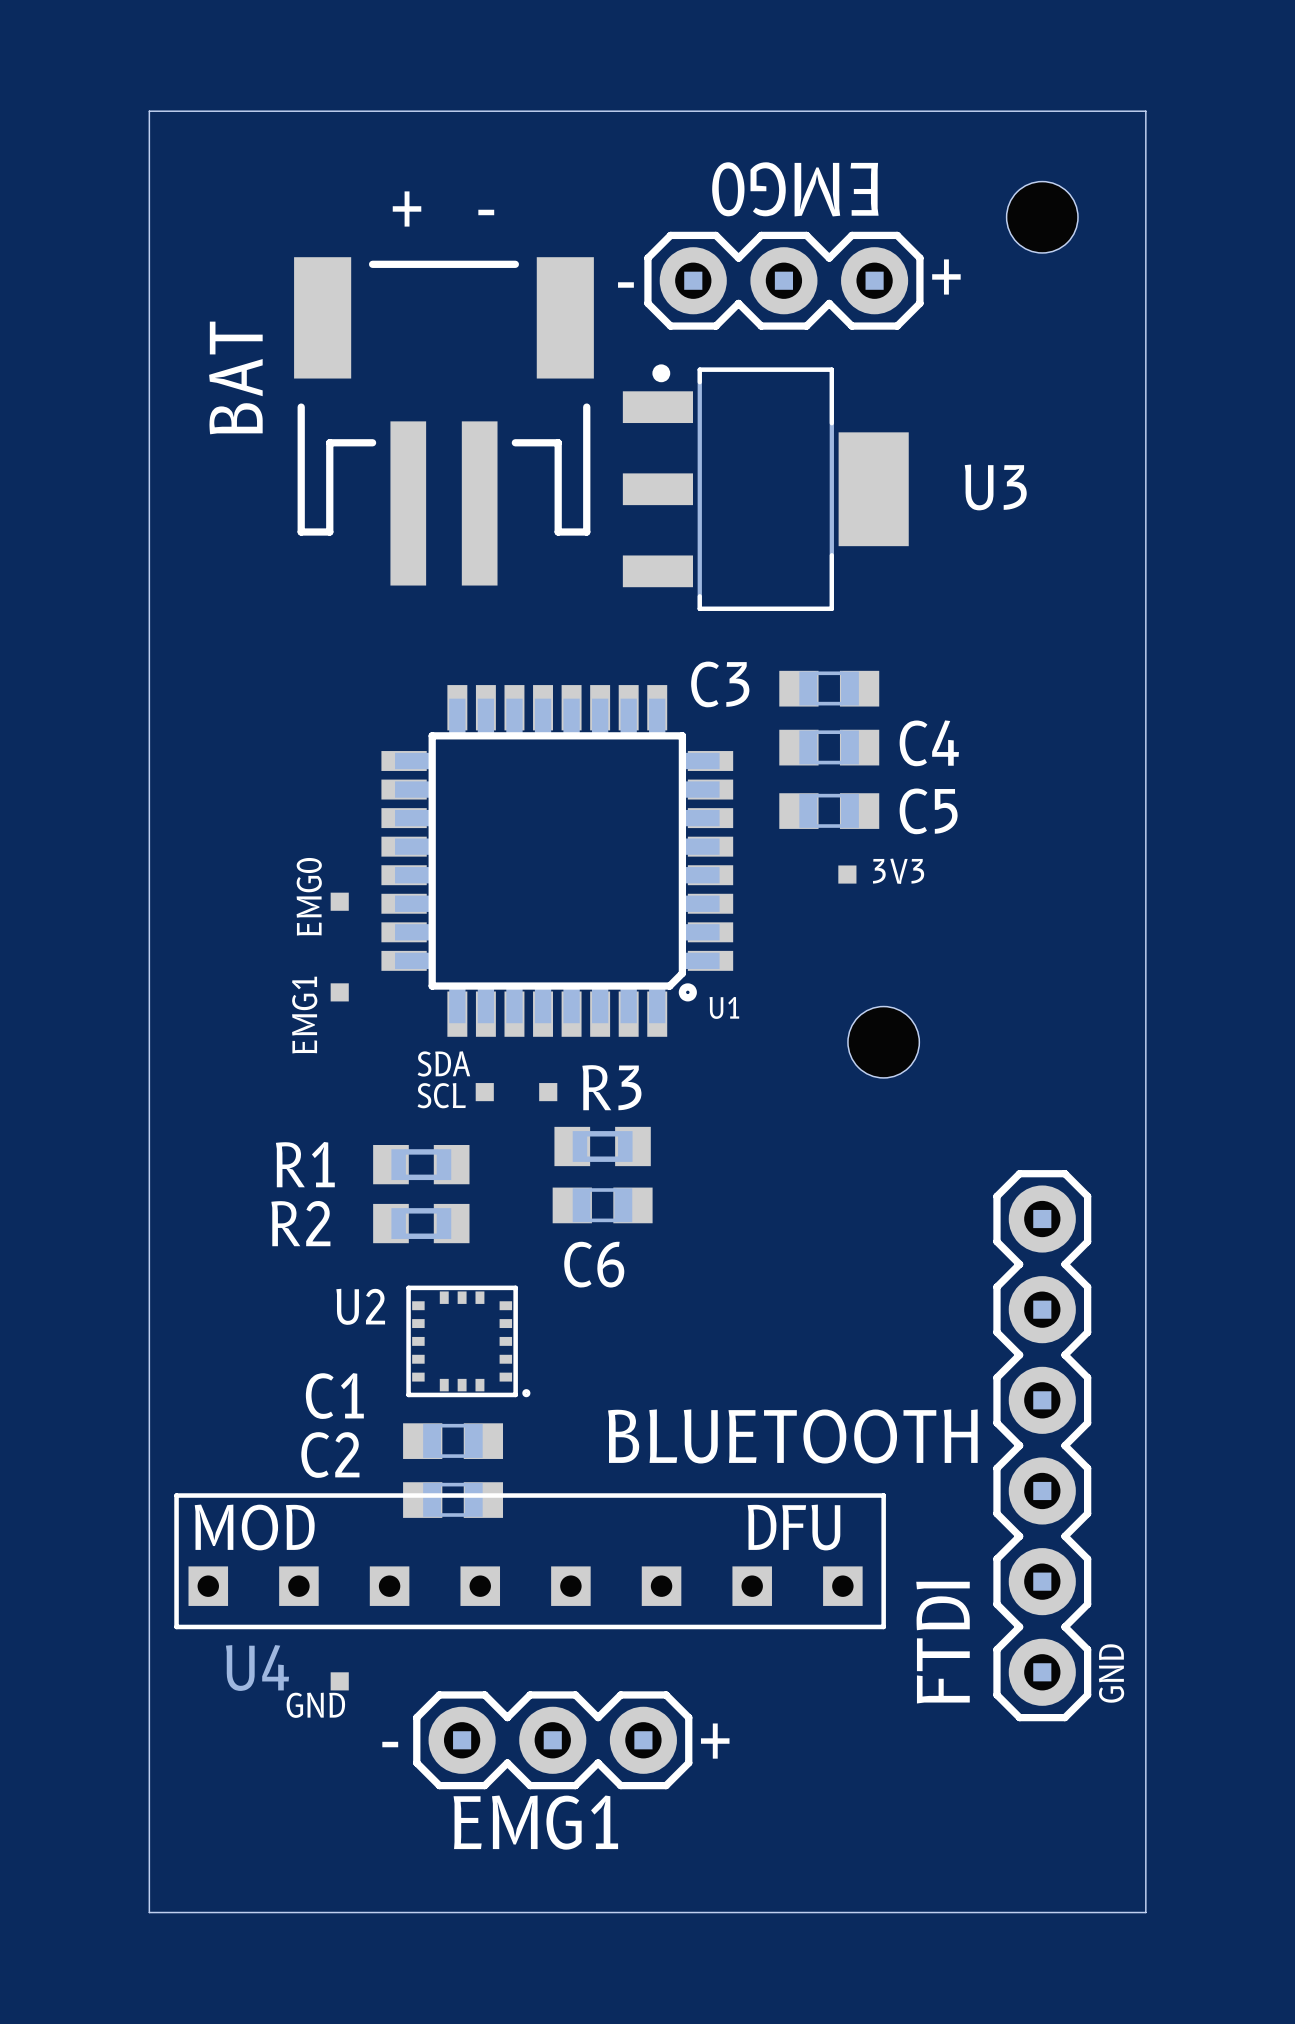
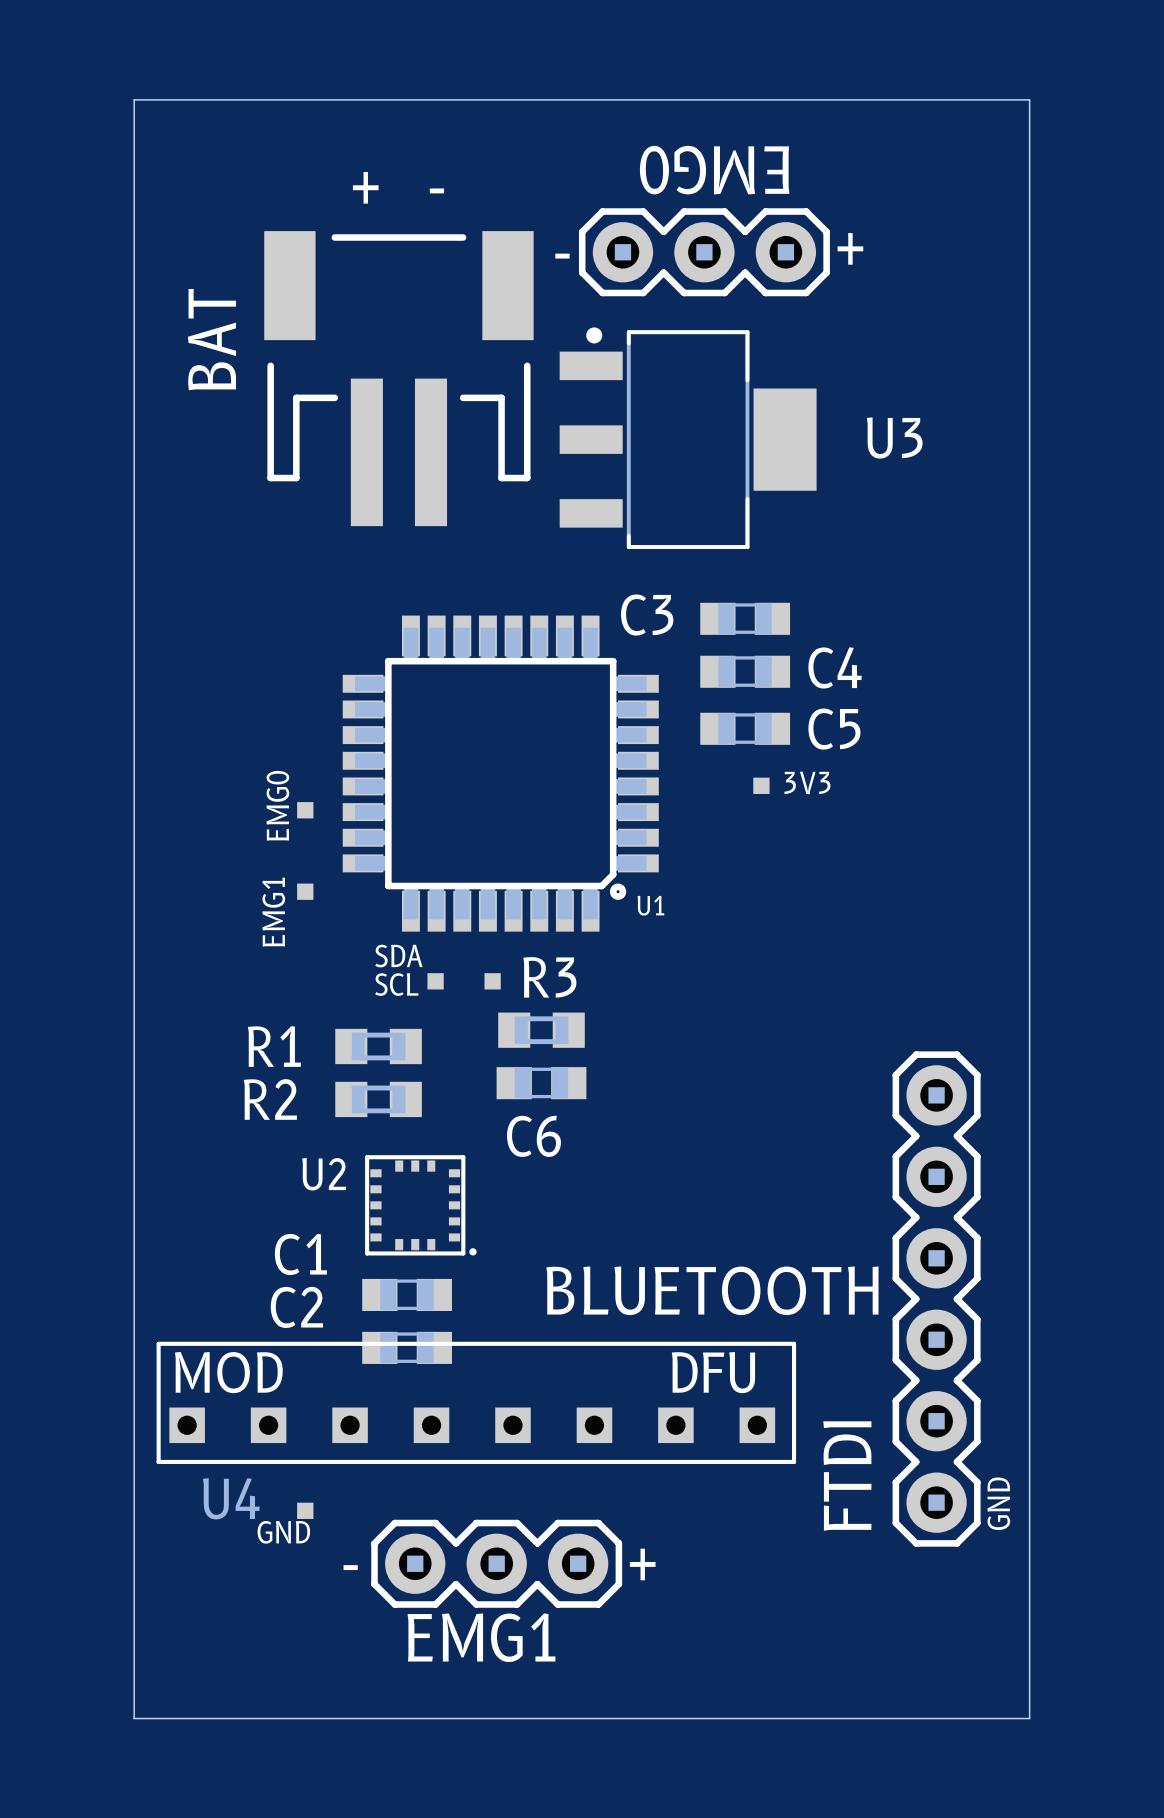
hole: (1042, 217) -> none
hole: (883, 1042) -> none

